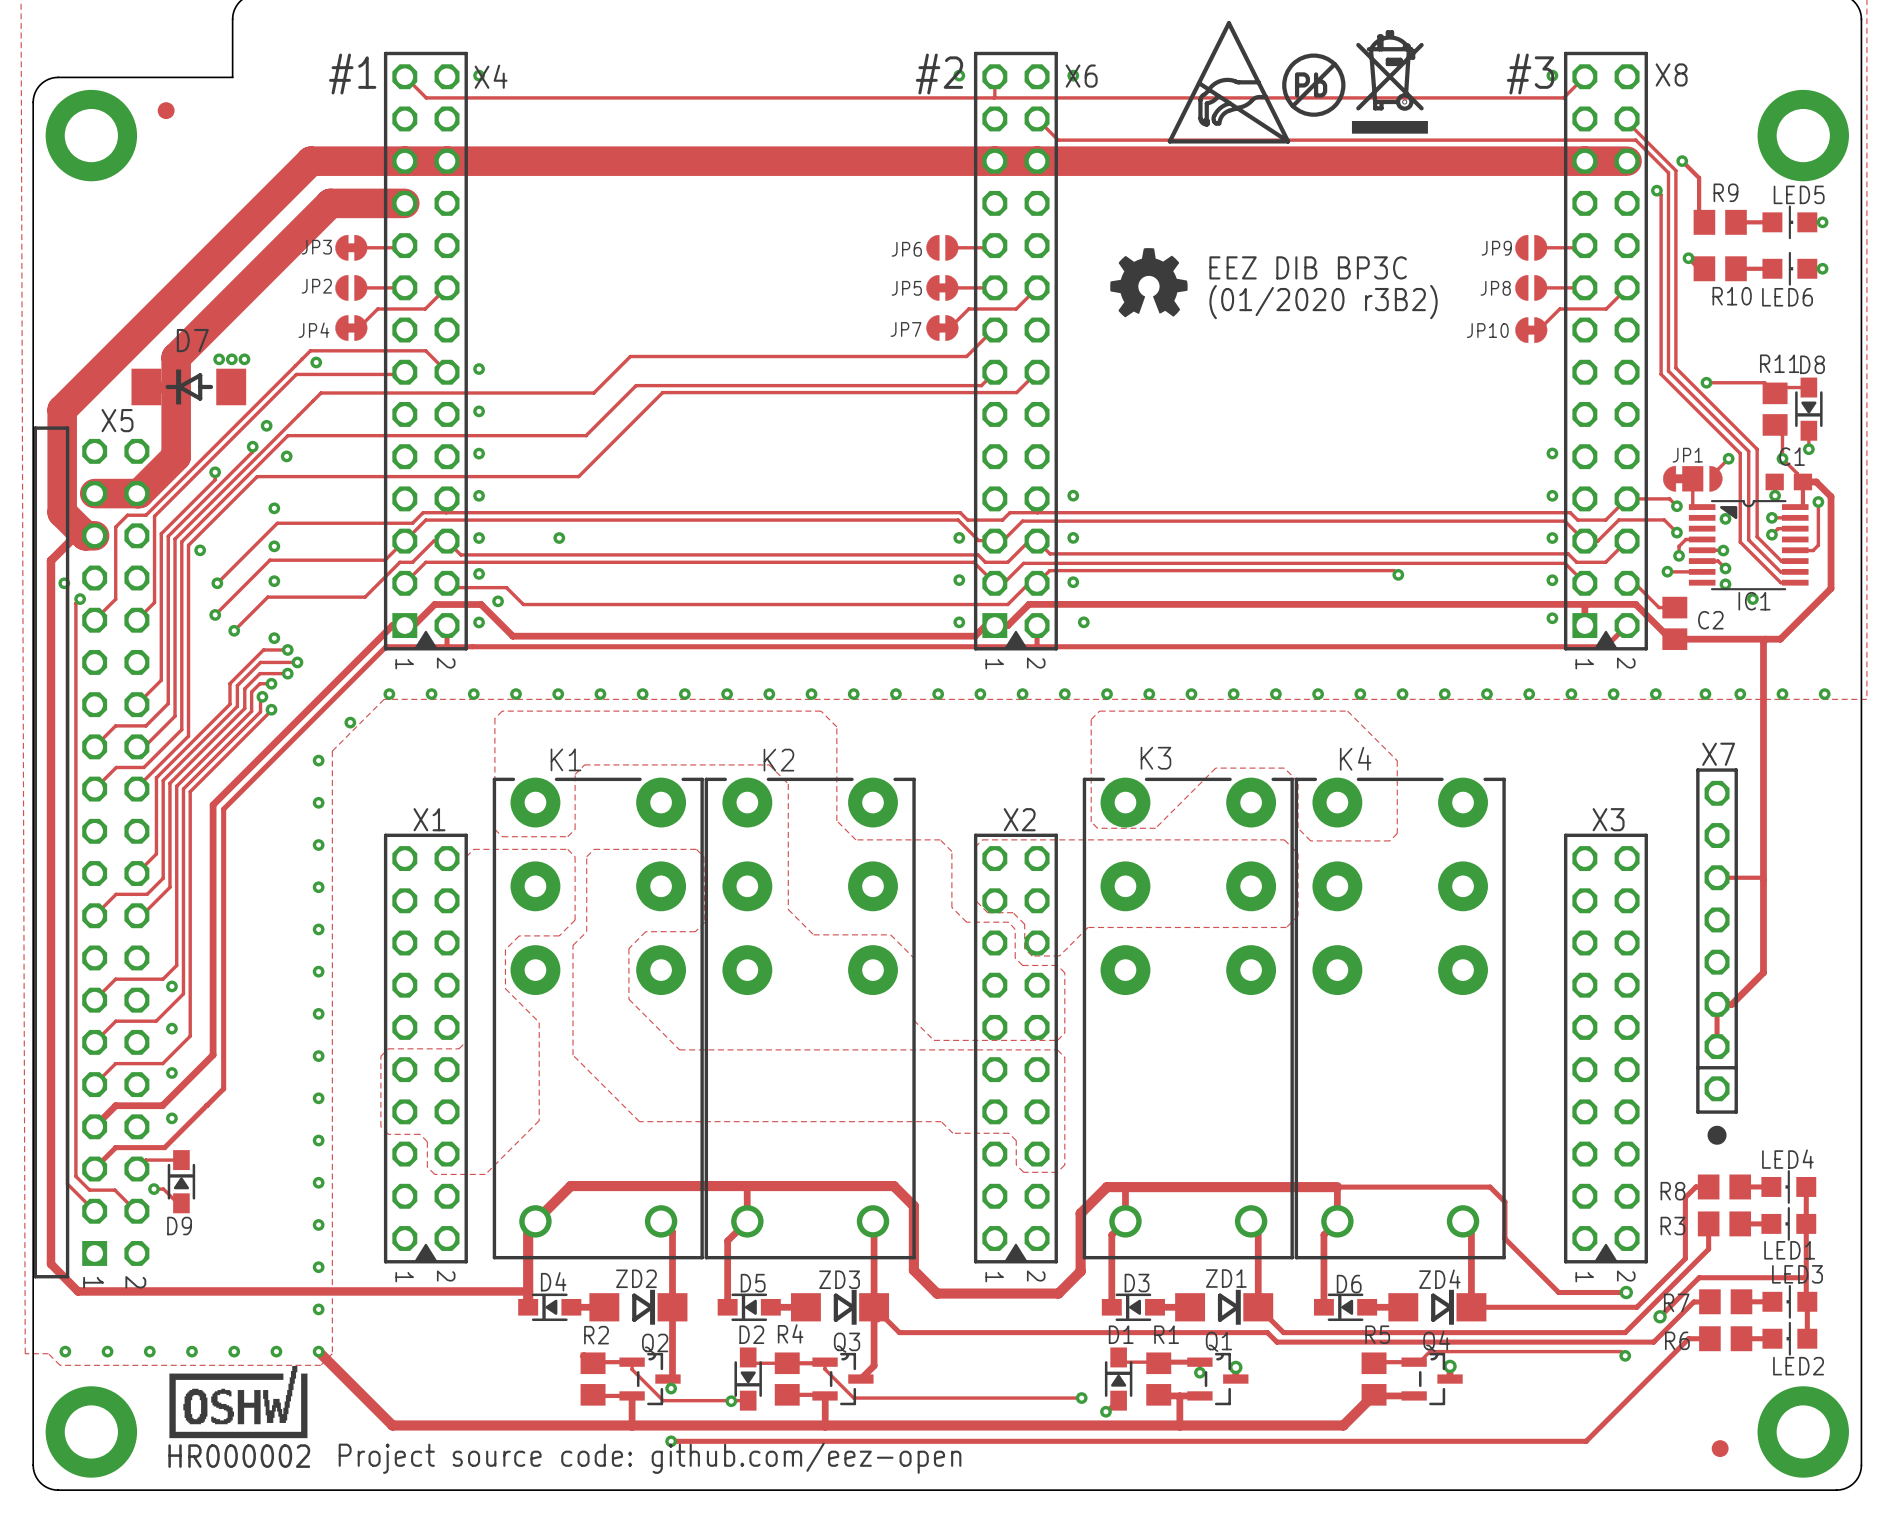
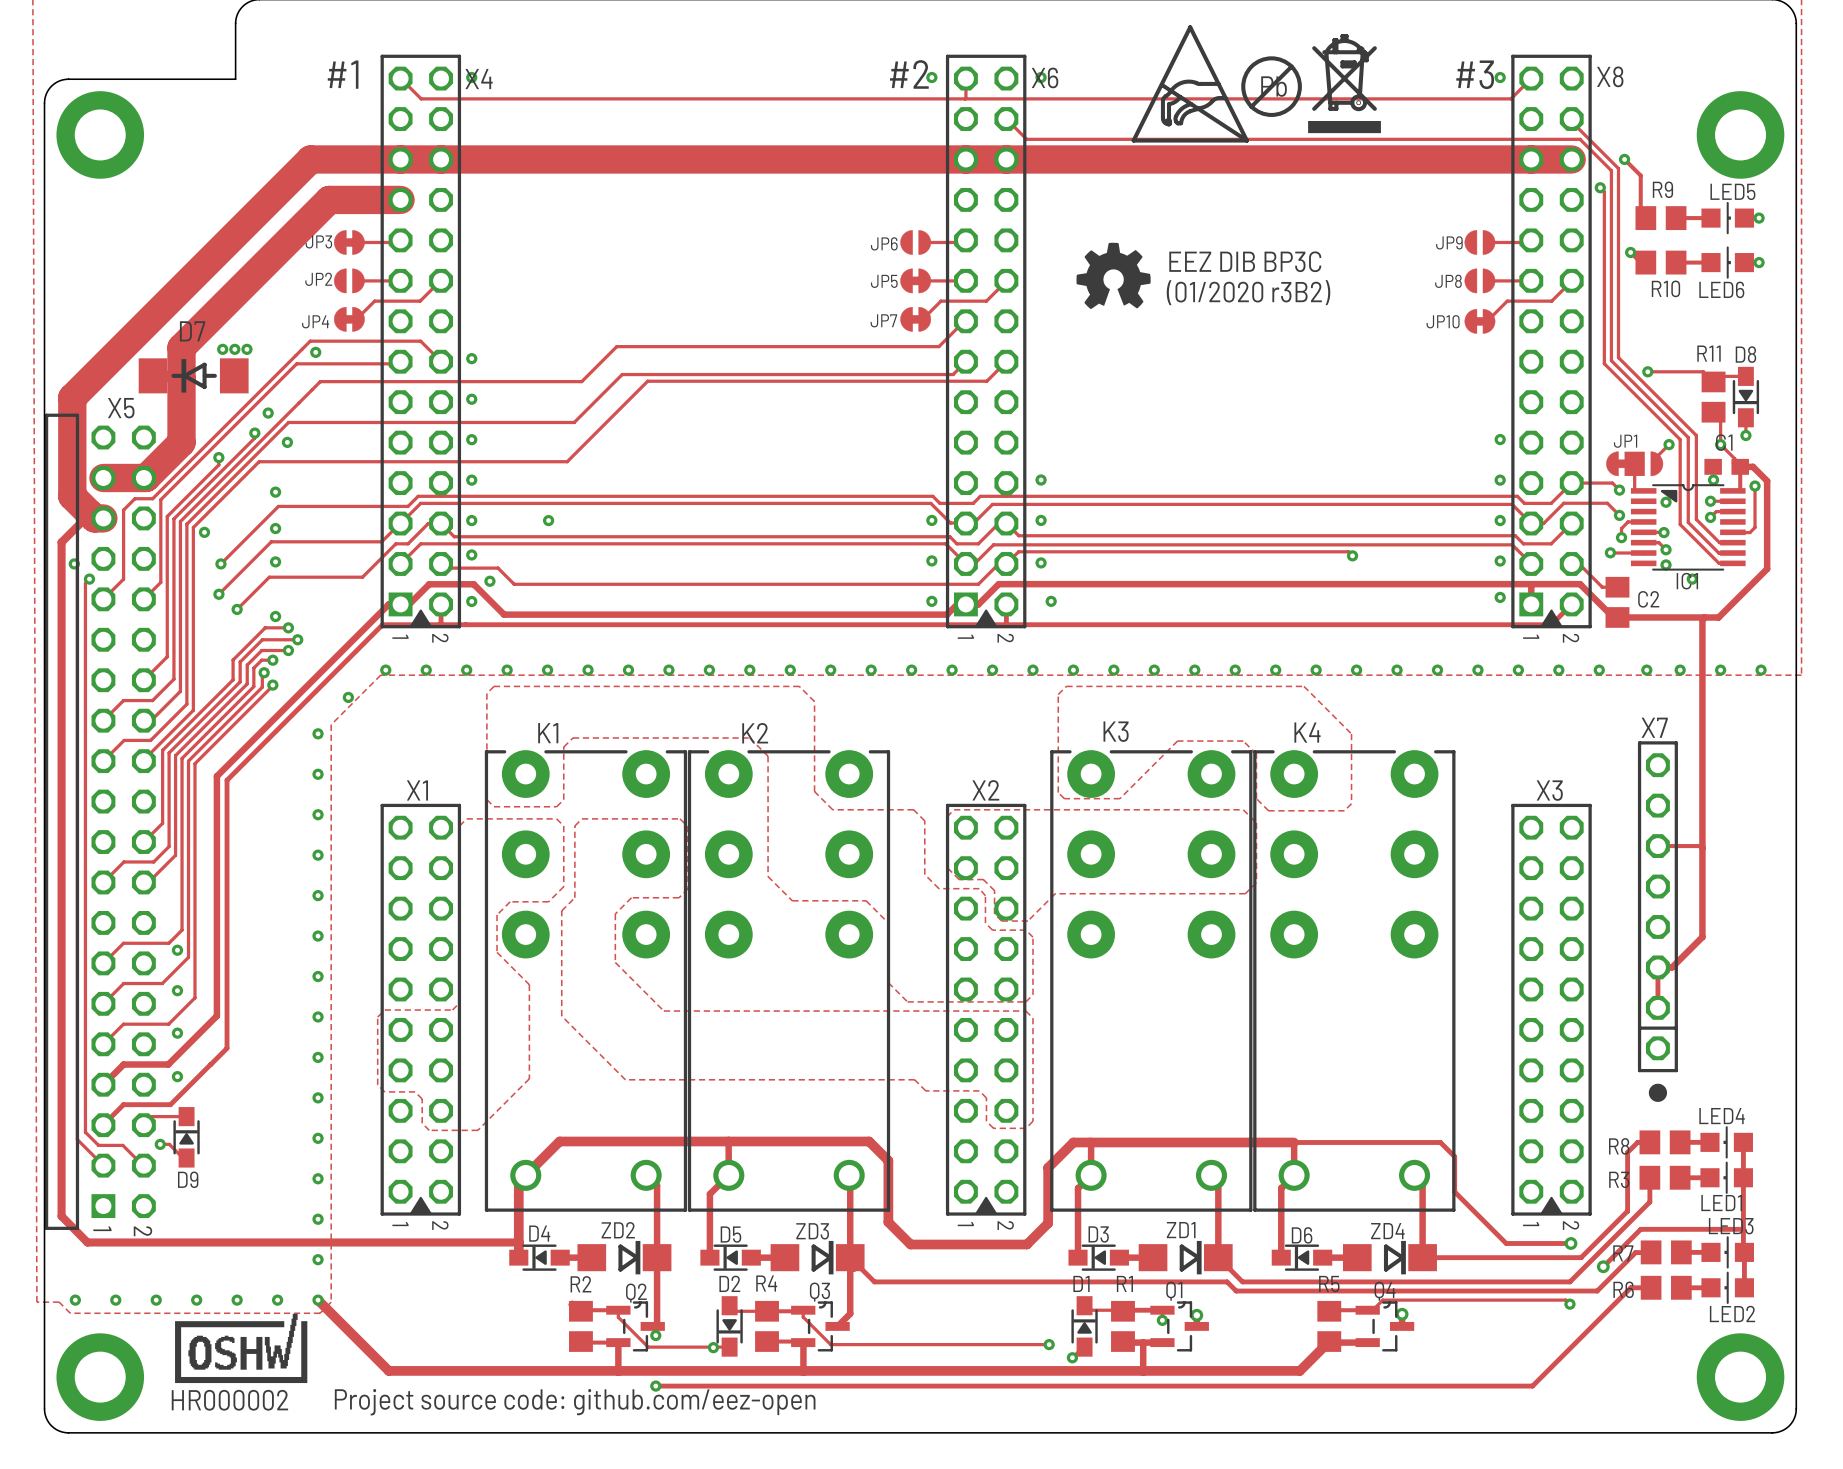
part: (166, 110) -> none
part: (1720, 1448) -> none

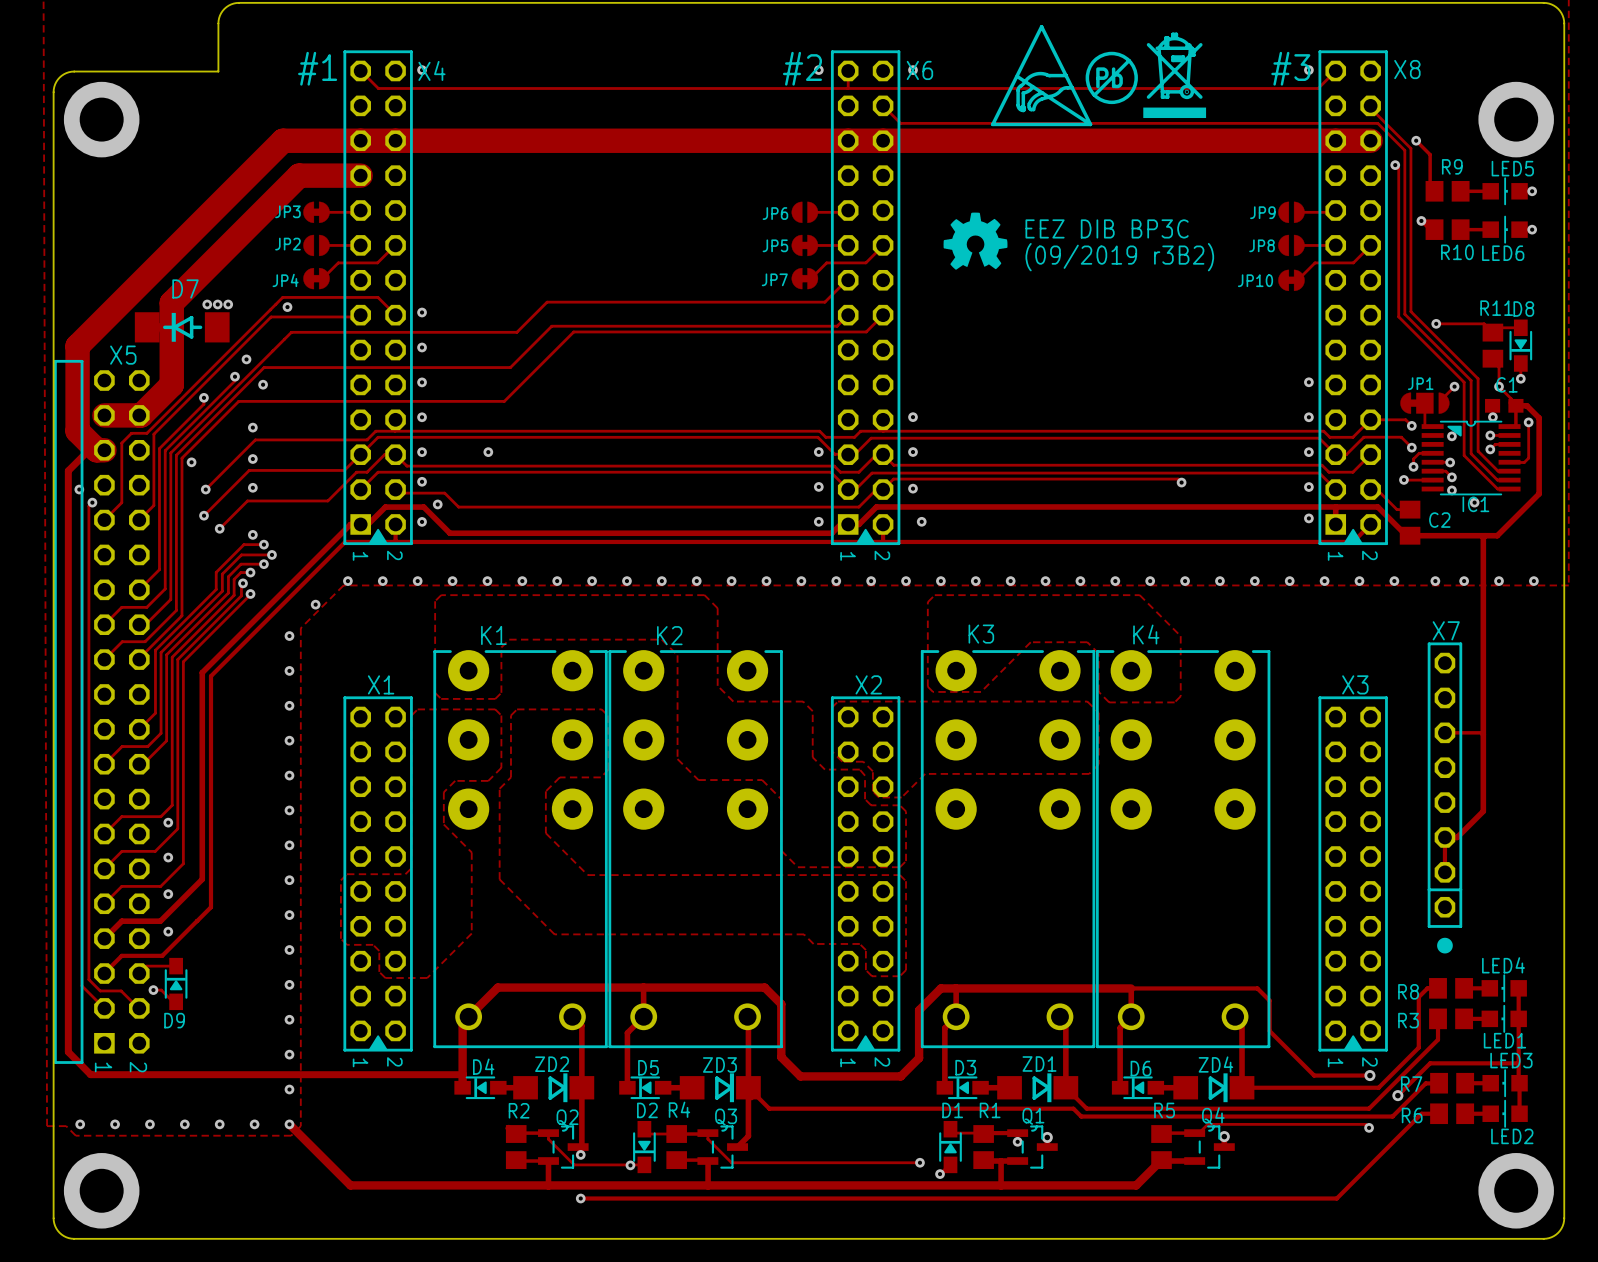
text: (01/2020 r3B2) (1248, 292) -> (09/2019 r3B2) (1119, 257)
drawing: [175, 1313, 308, 1384] -> none
text: Project source code: github.com/eez-open (575, 1402) -> none

